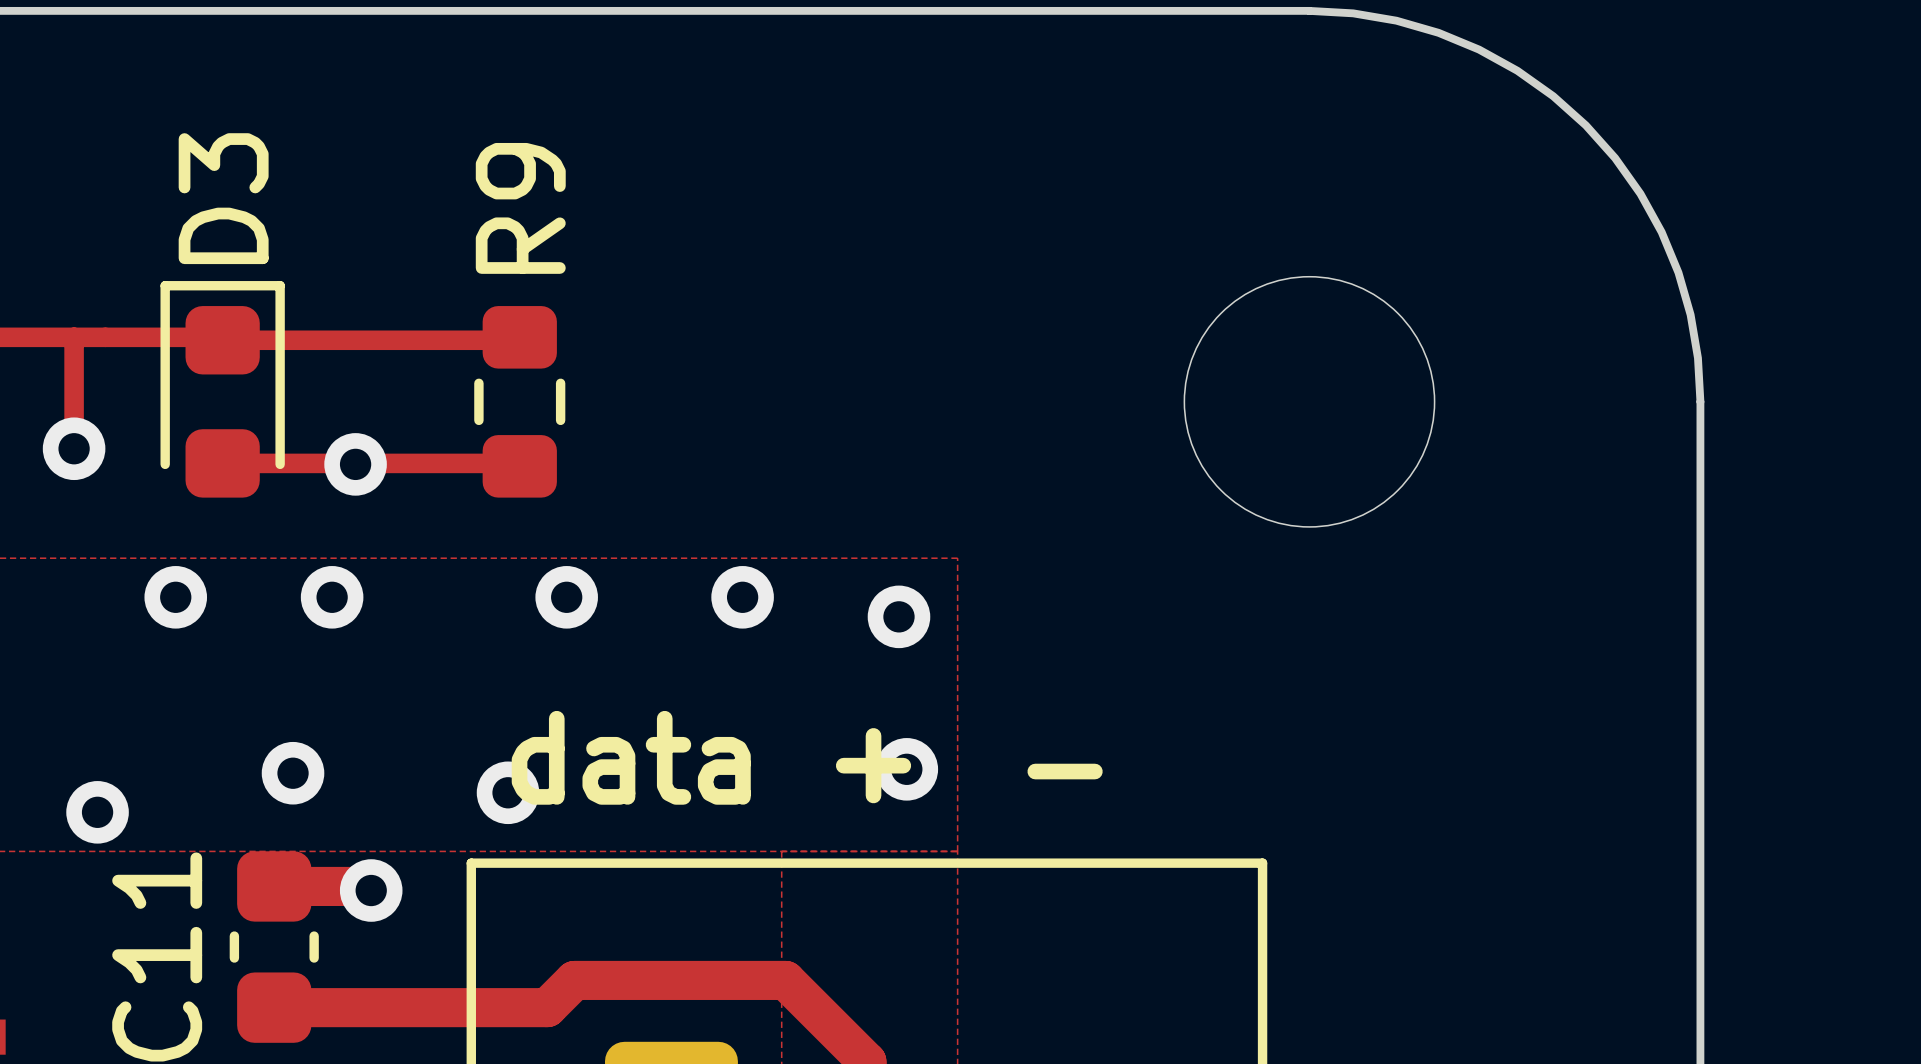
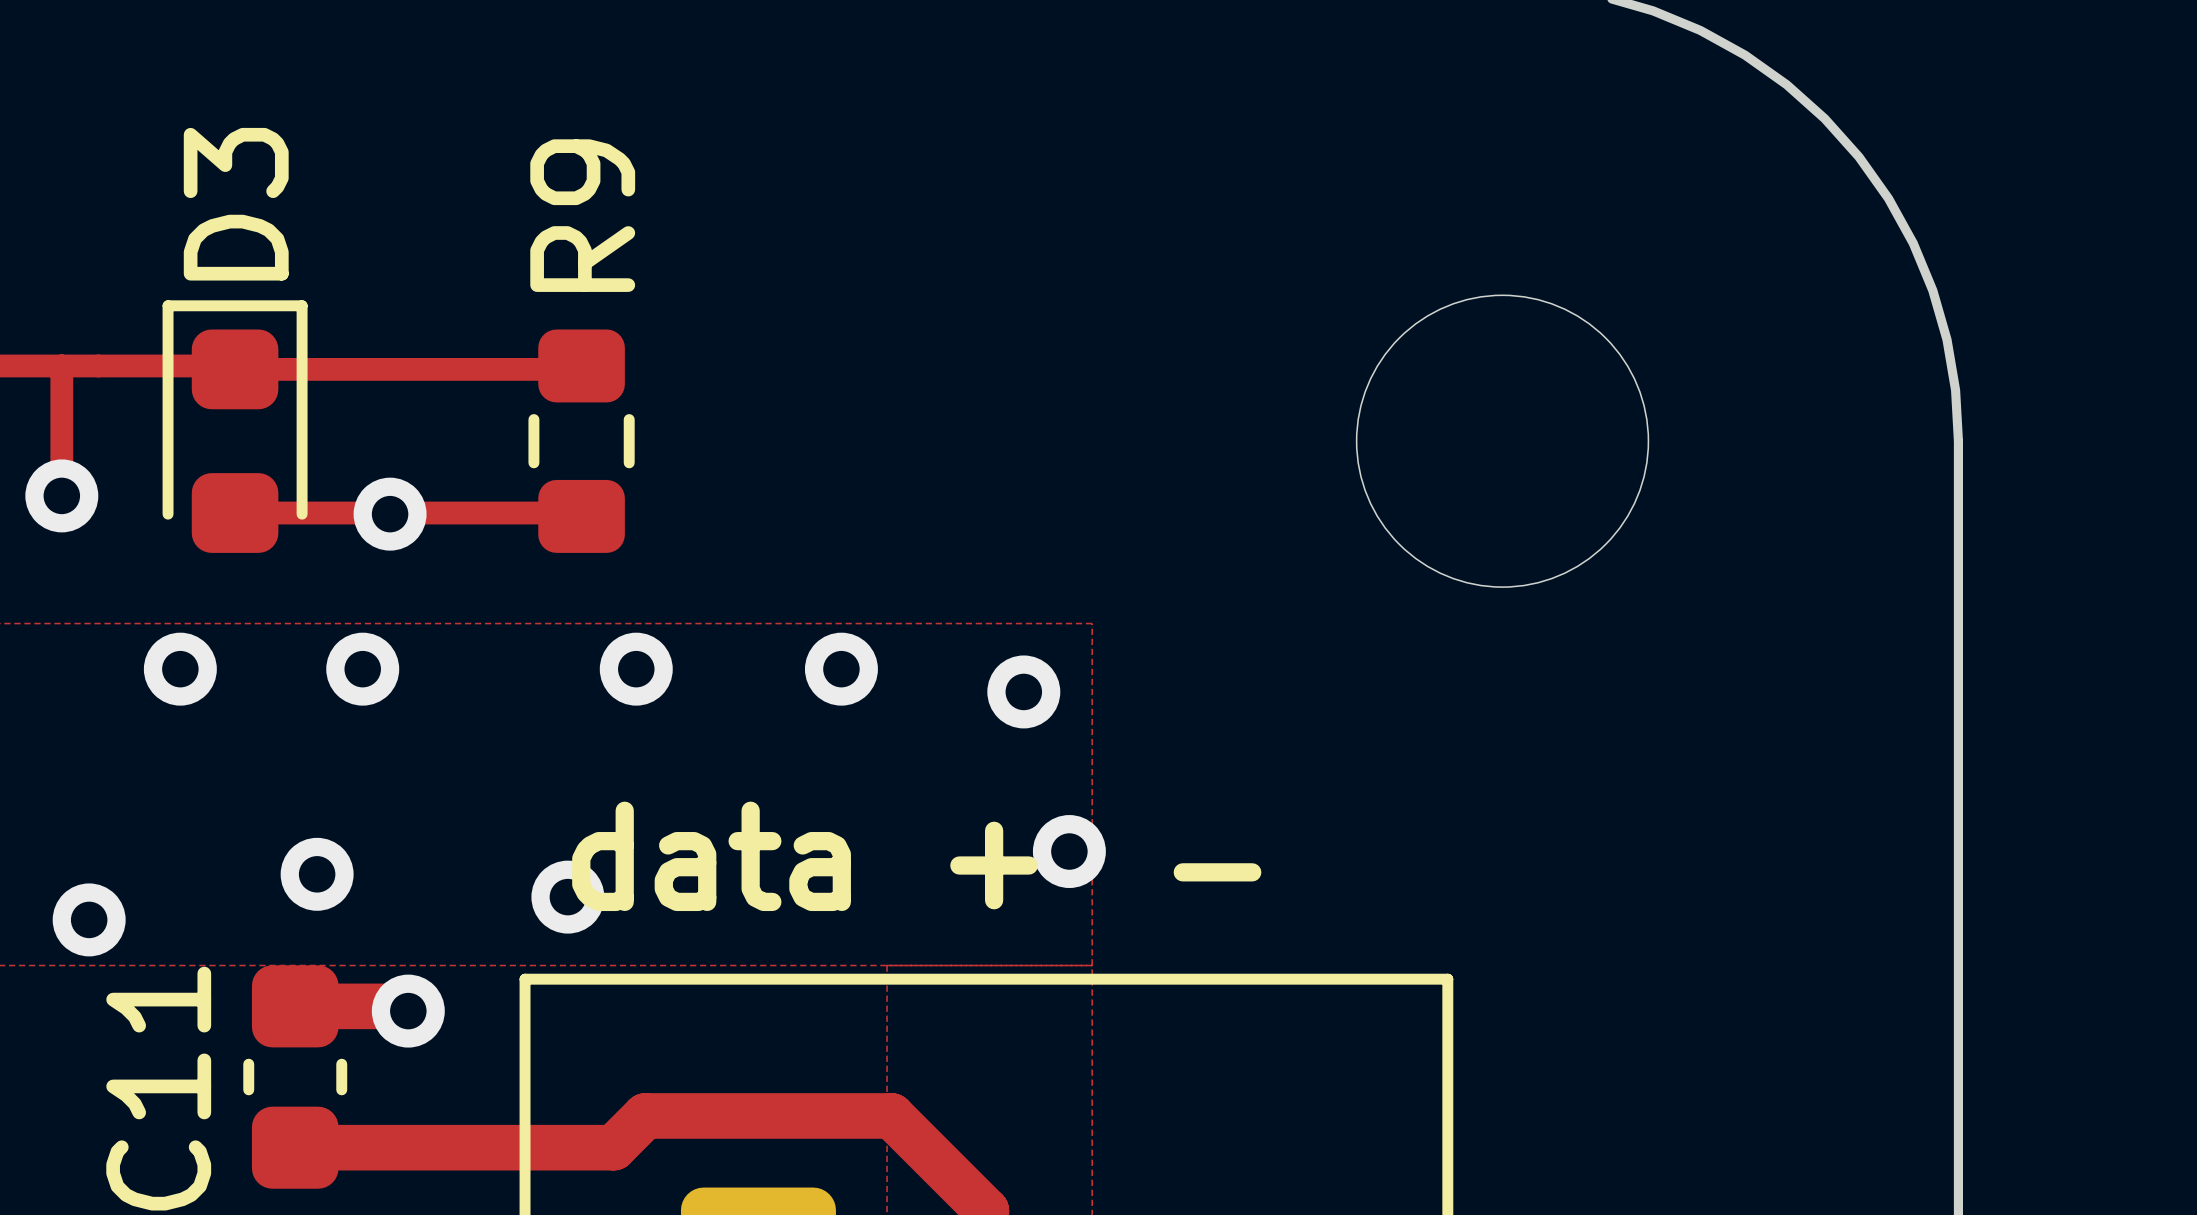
via position: (906, 769) -> (1069, 851)

